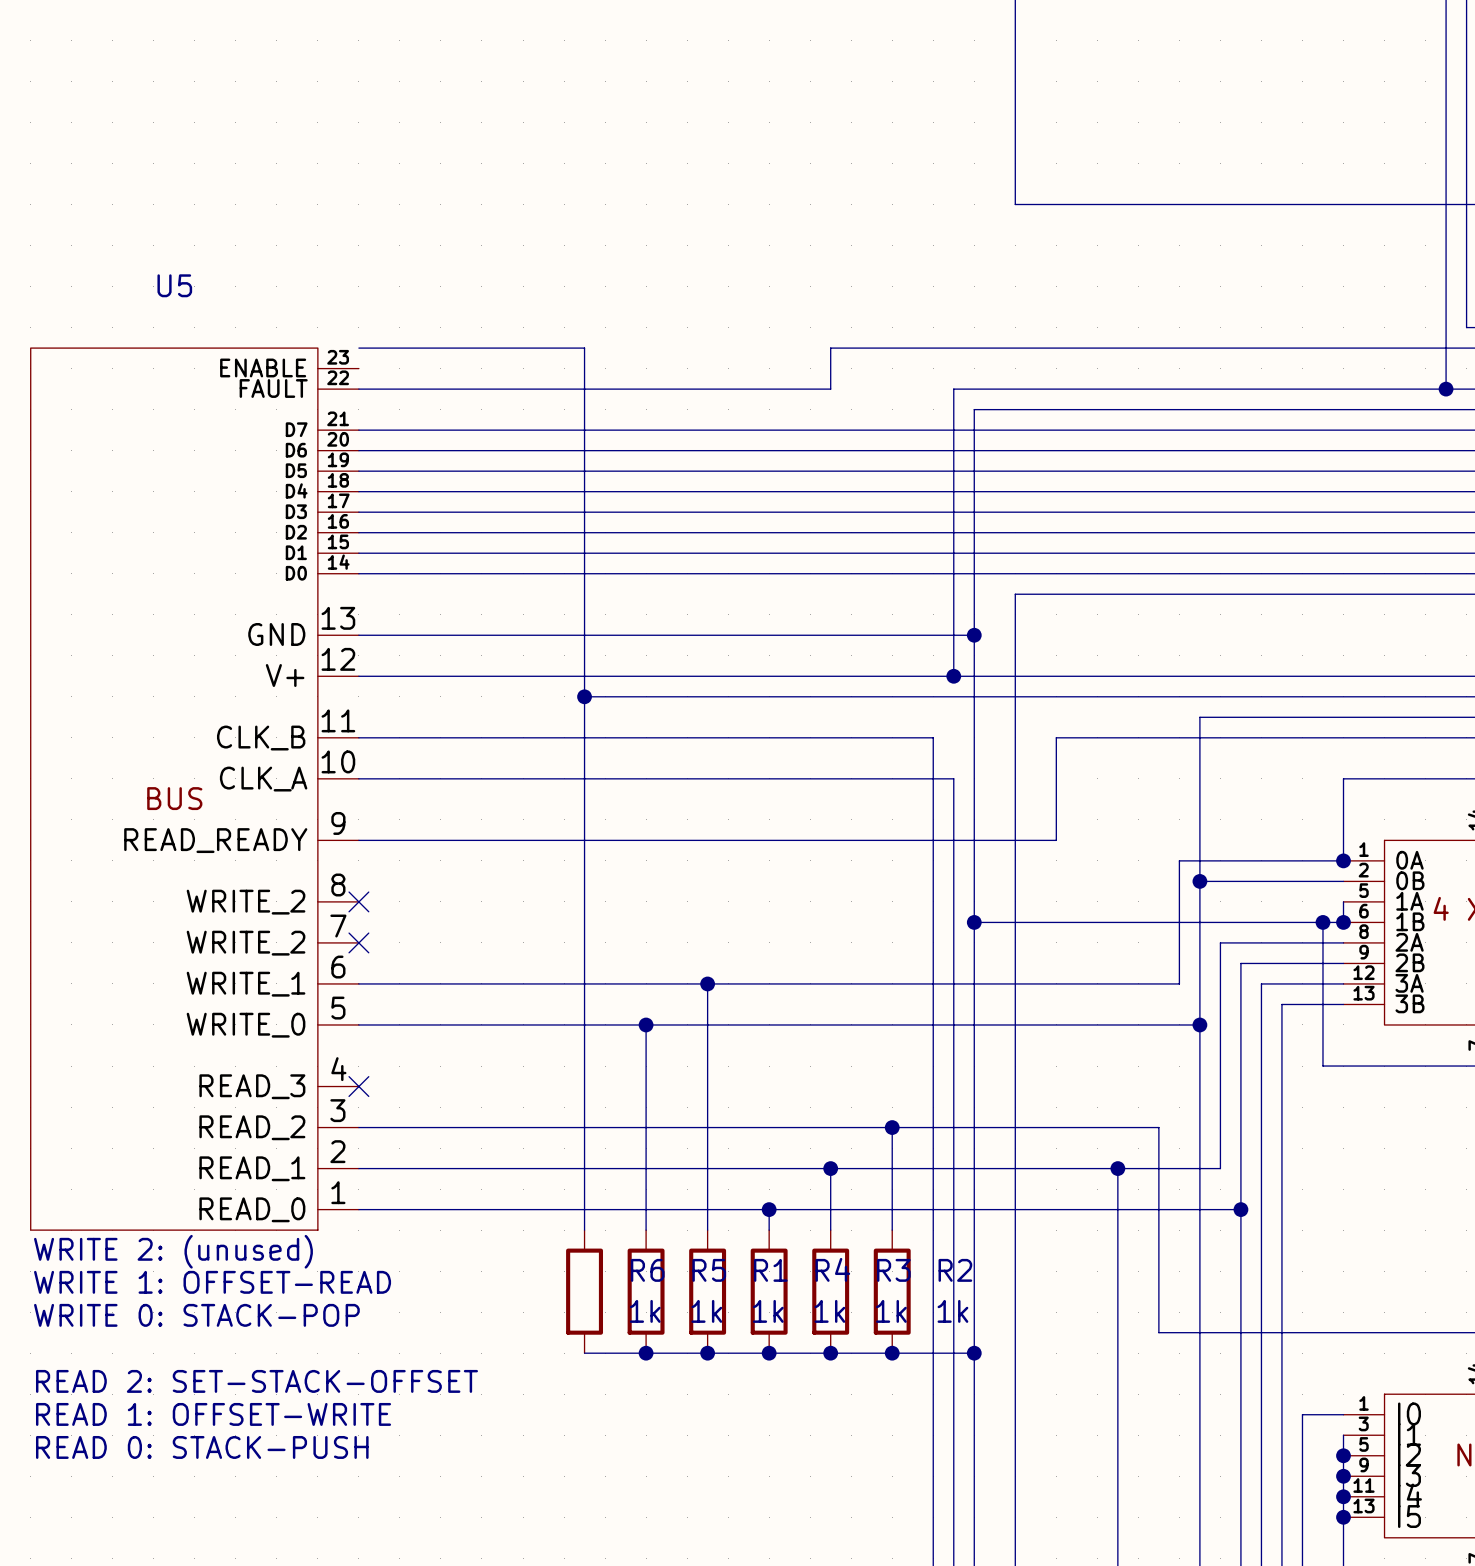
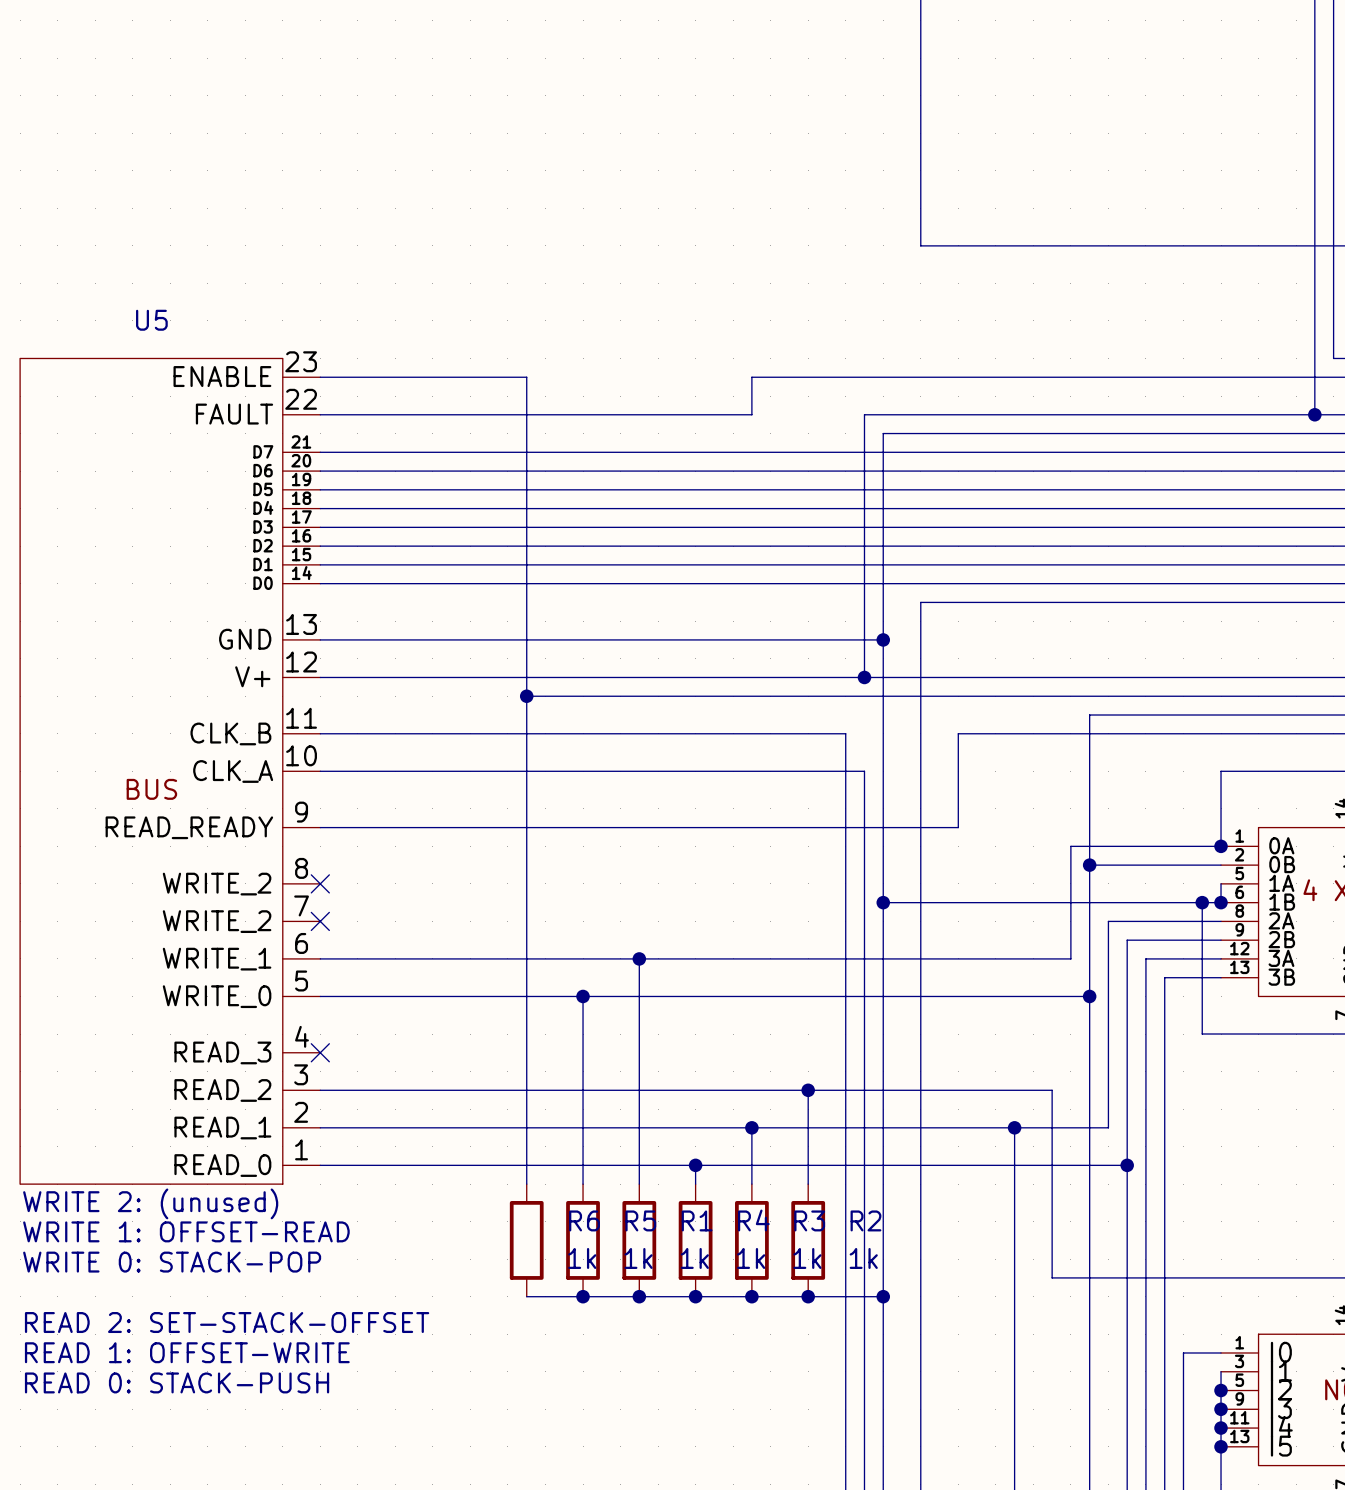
U5 symbol: [30, 348, 359, 1231] -> [20, 358, 321, 1185]

